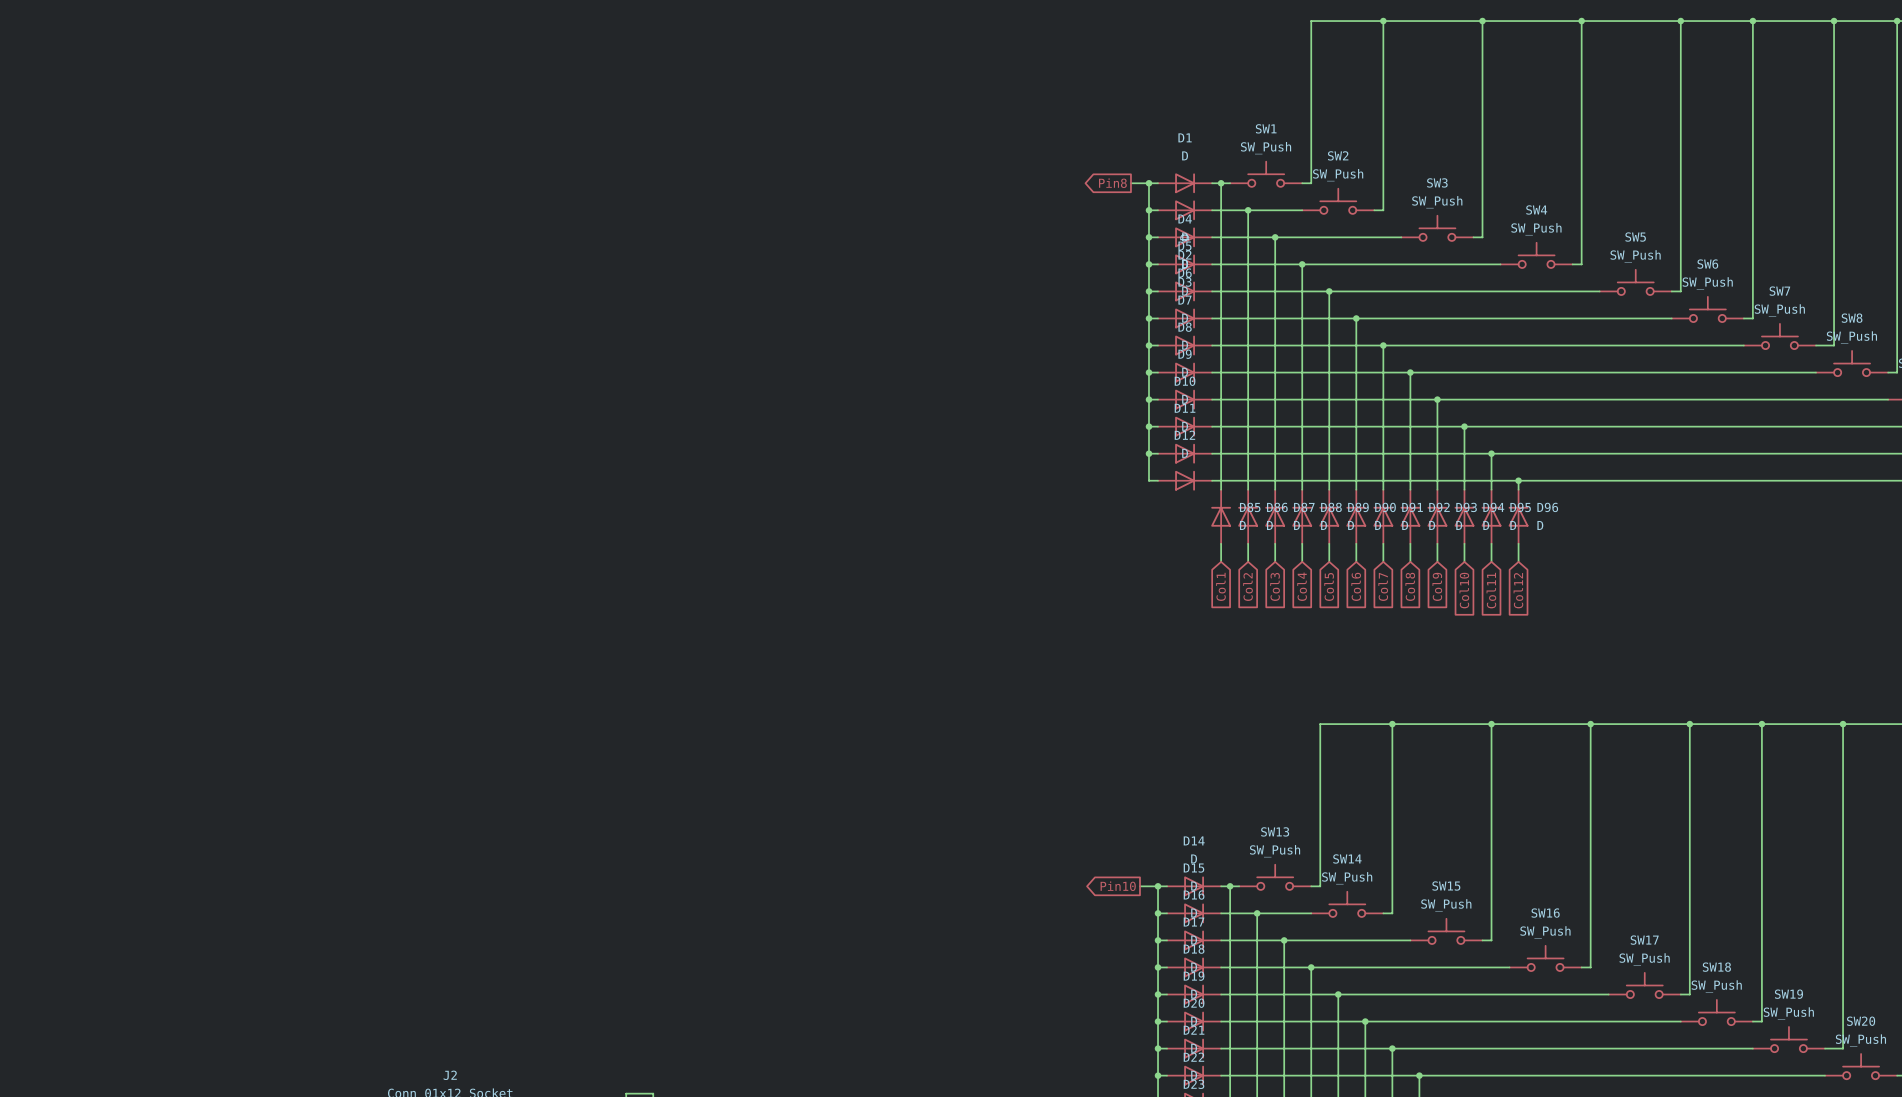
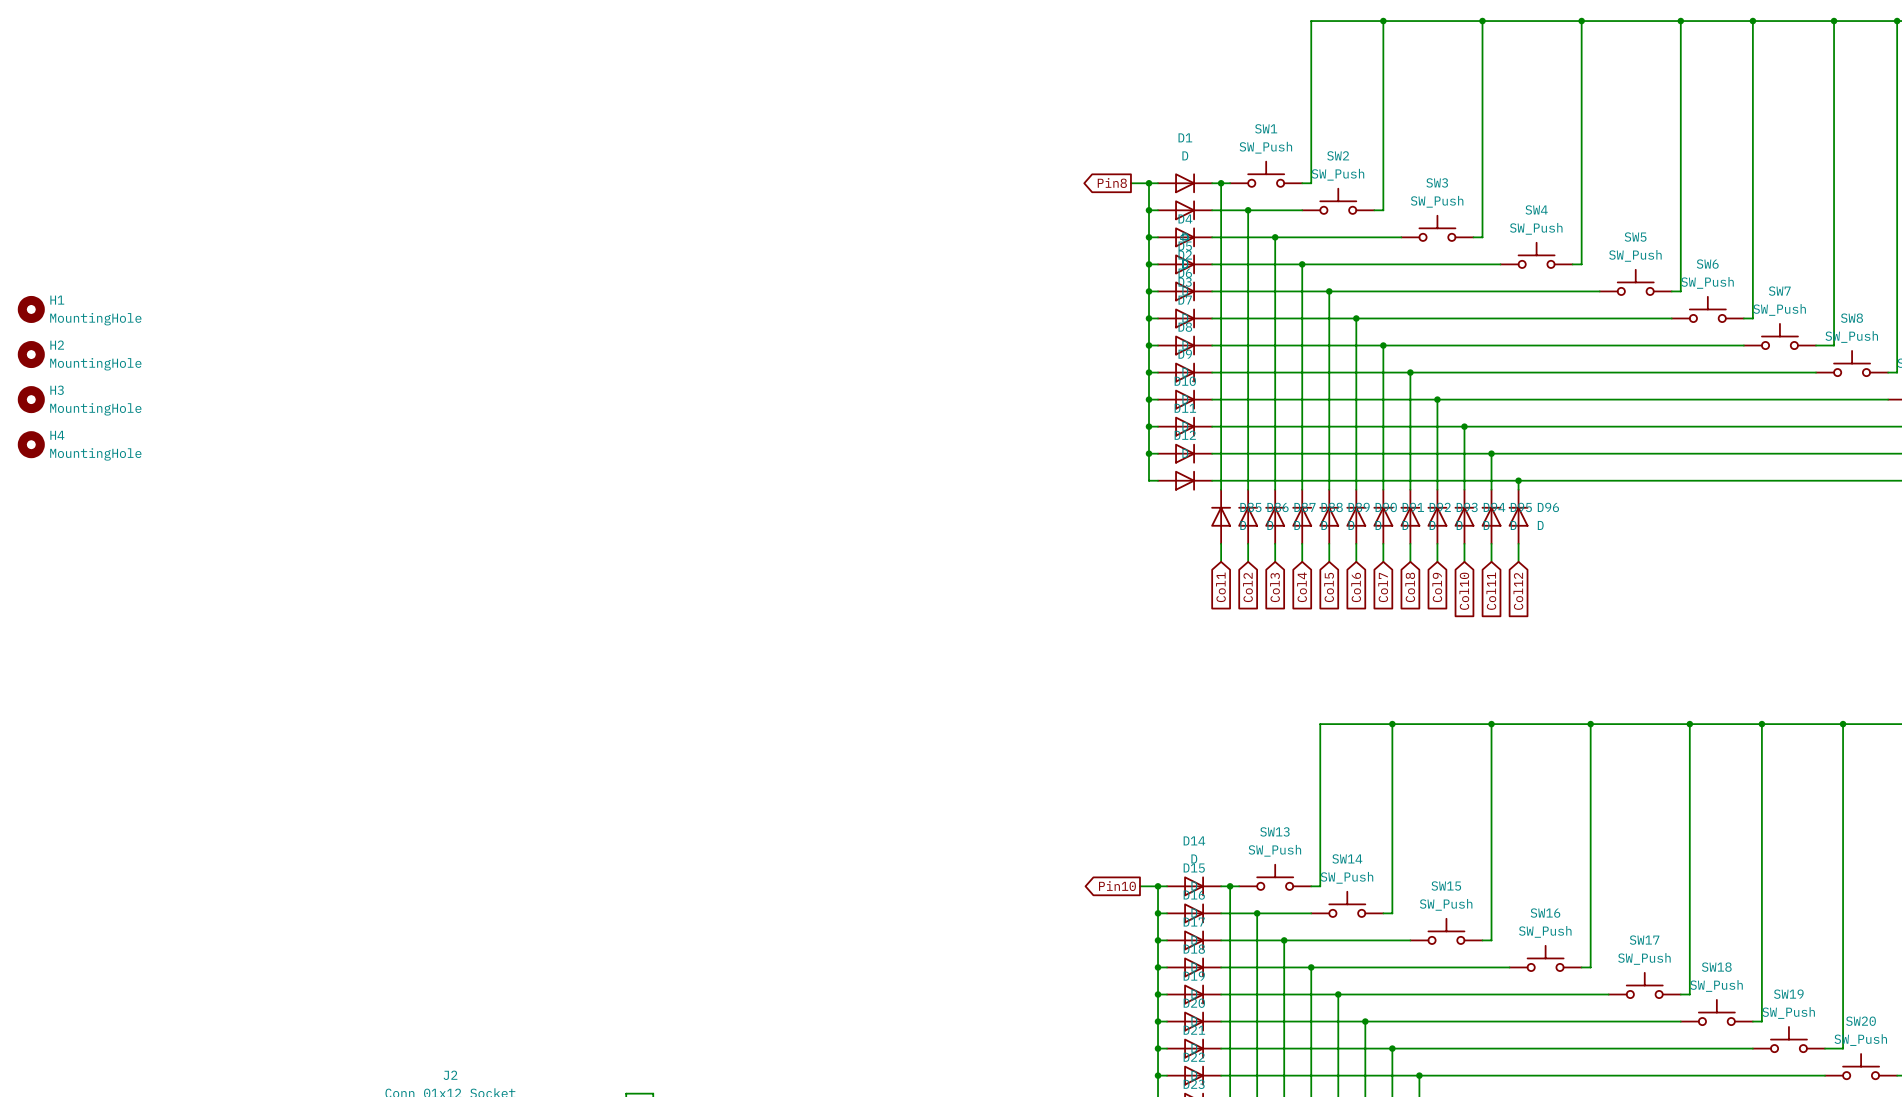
H1: none -> MountingHole (31, 309)
H2: none -> MountingHole (31, 354)
H3: none -> MountingHole (31, 399)
H4: none -> MountingHole (31, 444)

